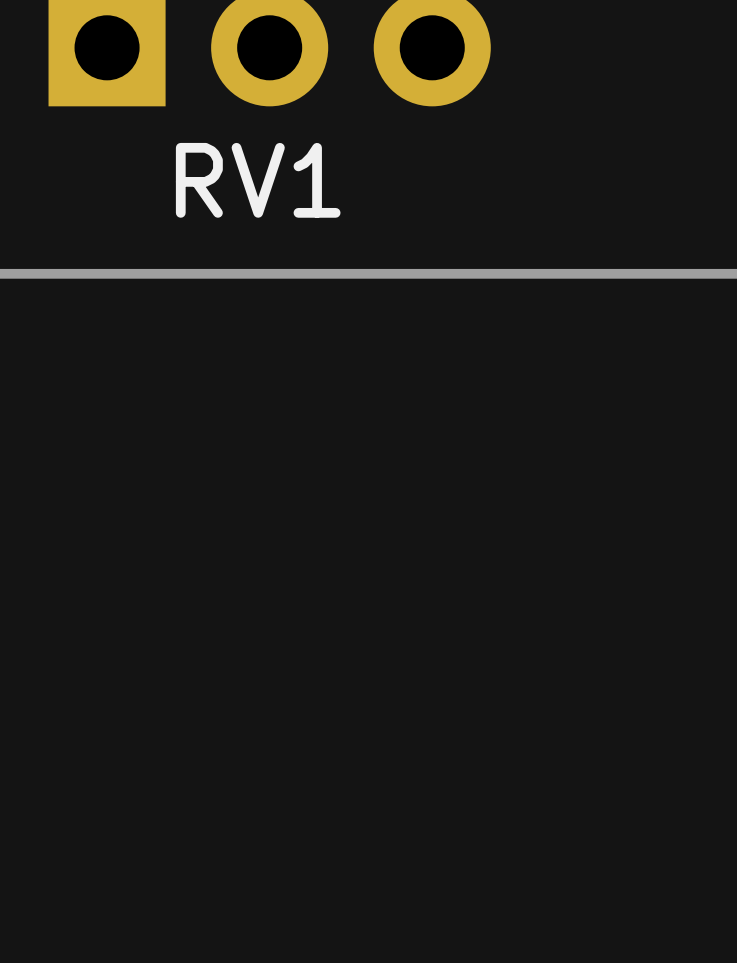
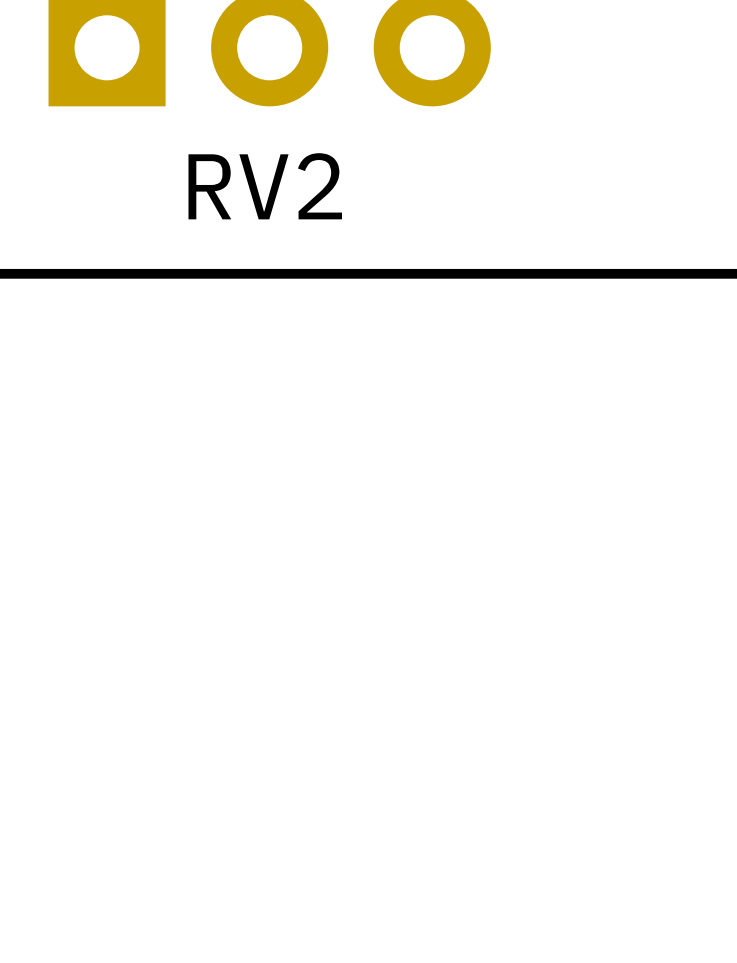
RV1 name: RV1 (258, 180) -> RV2 (265, 186)

